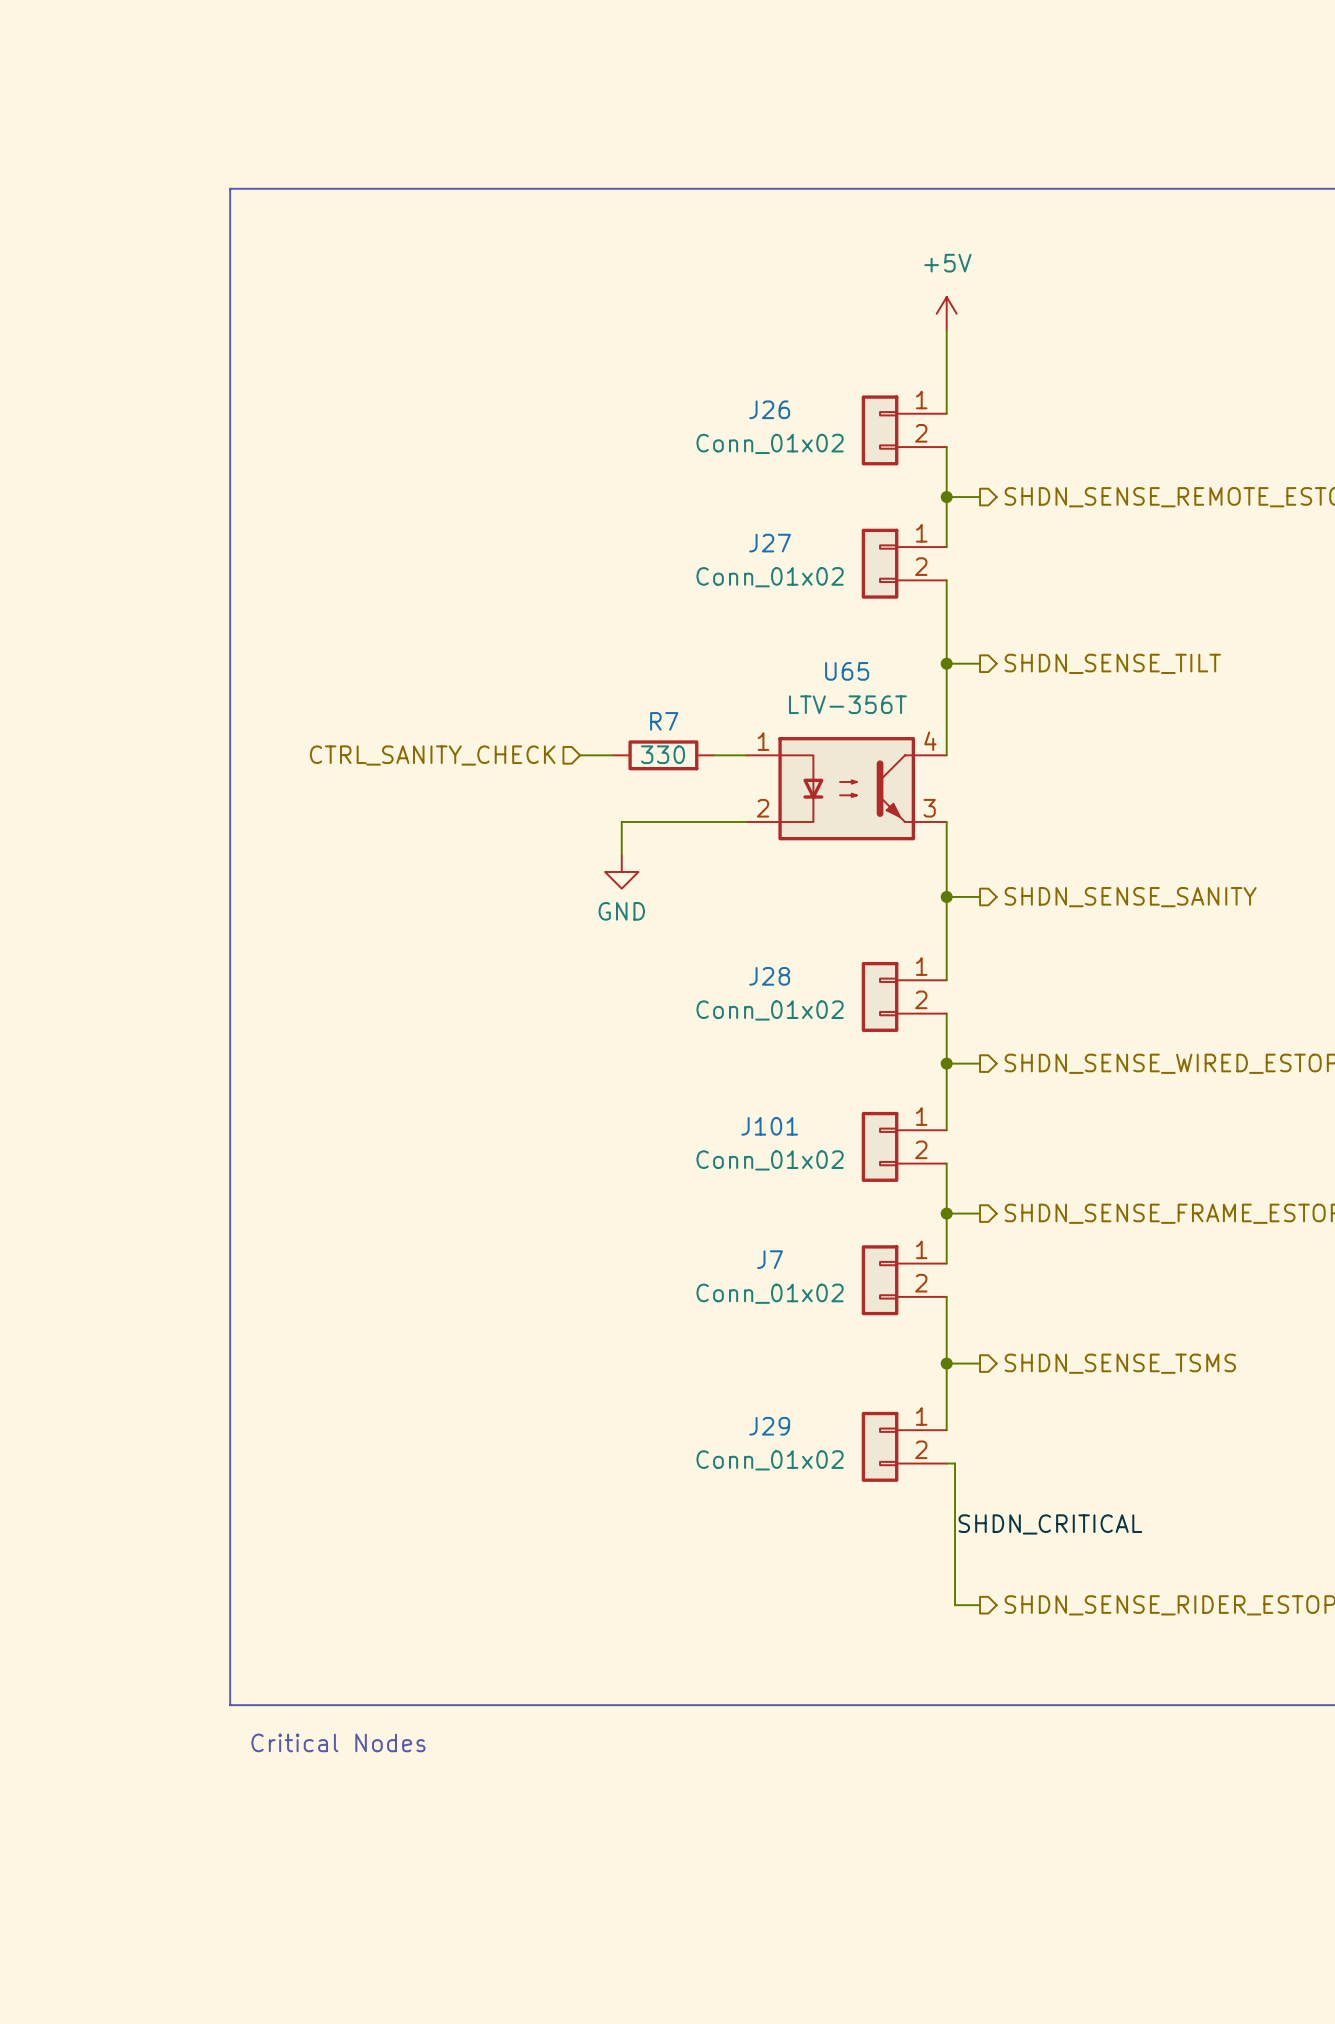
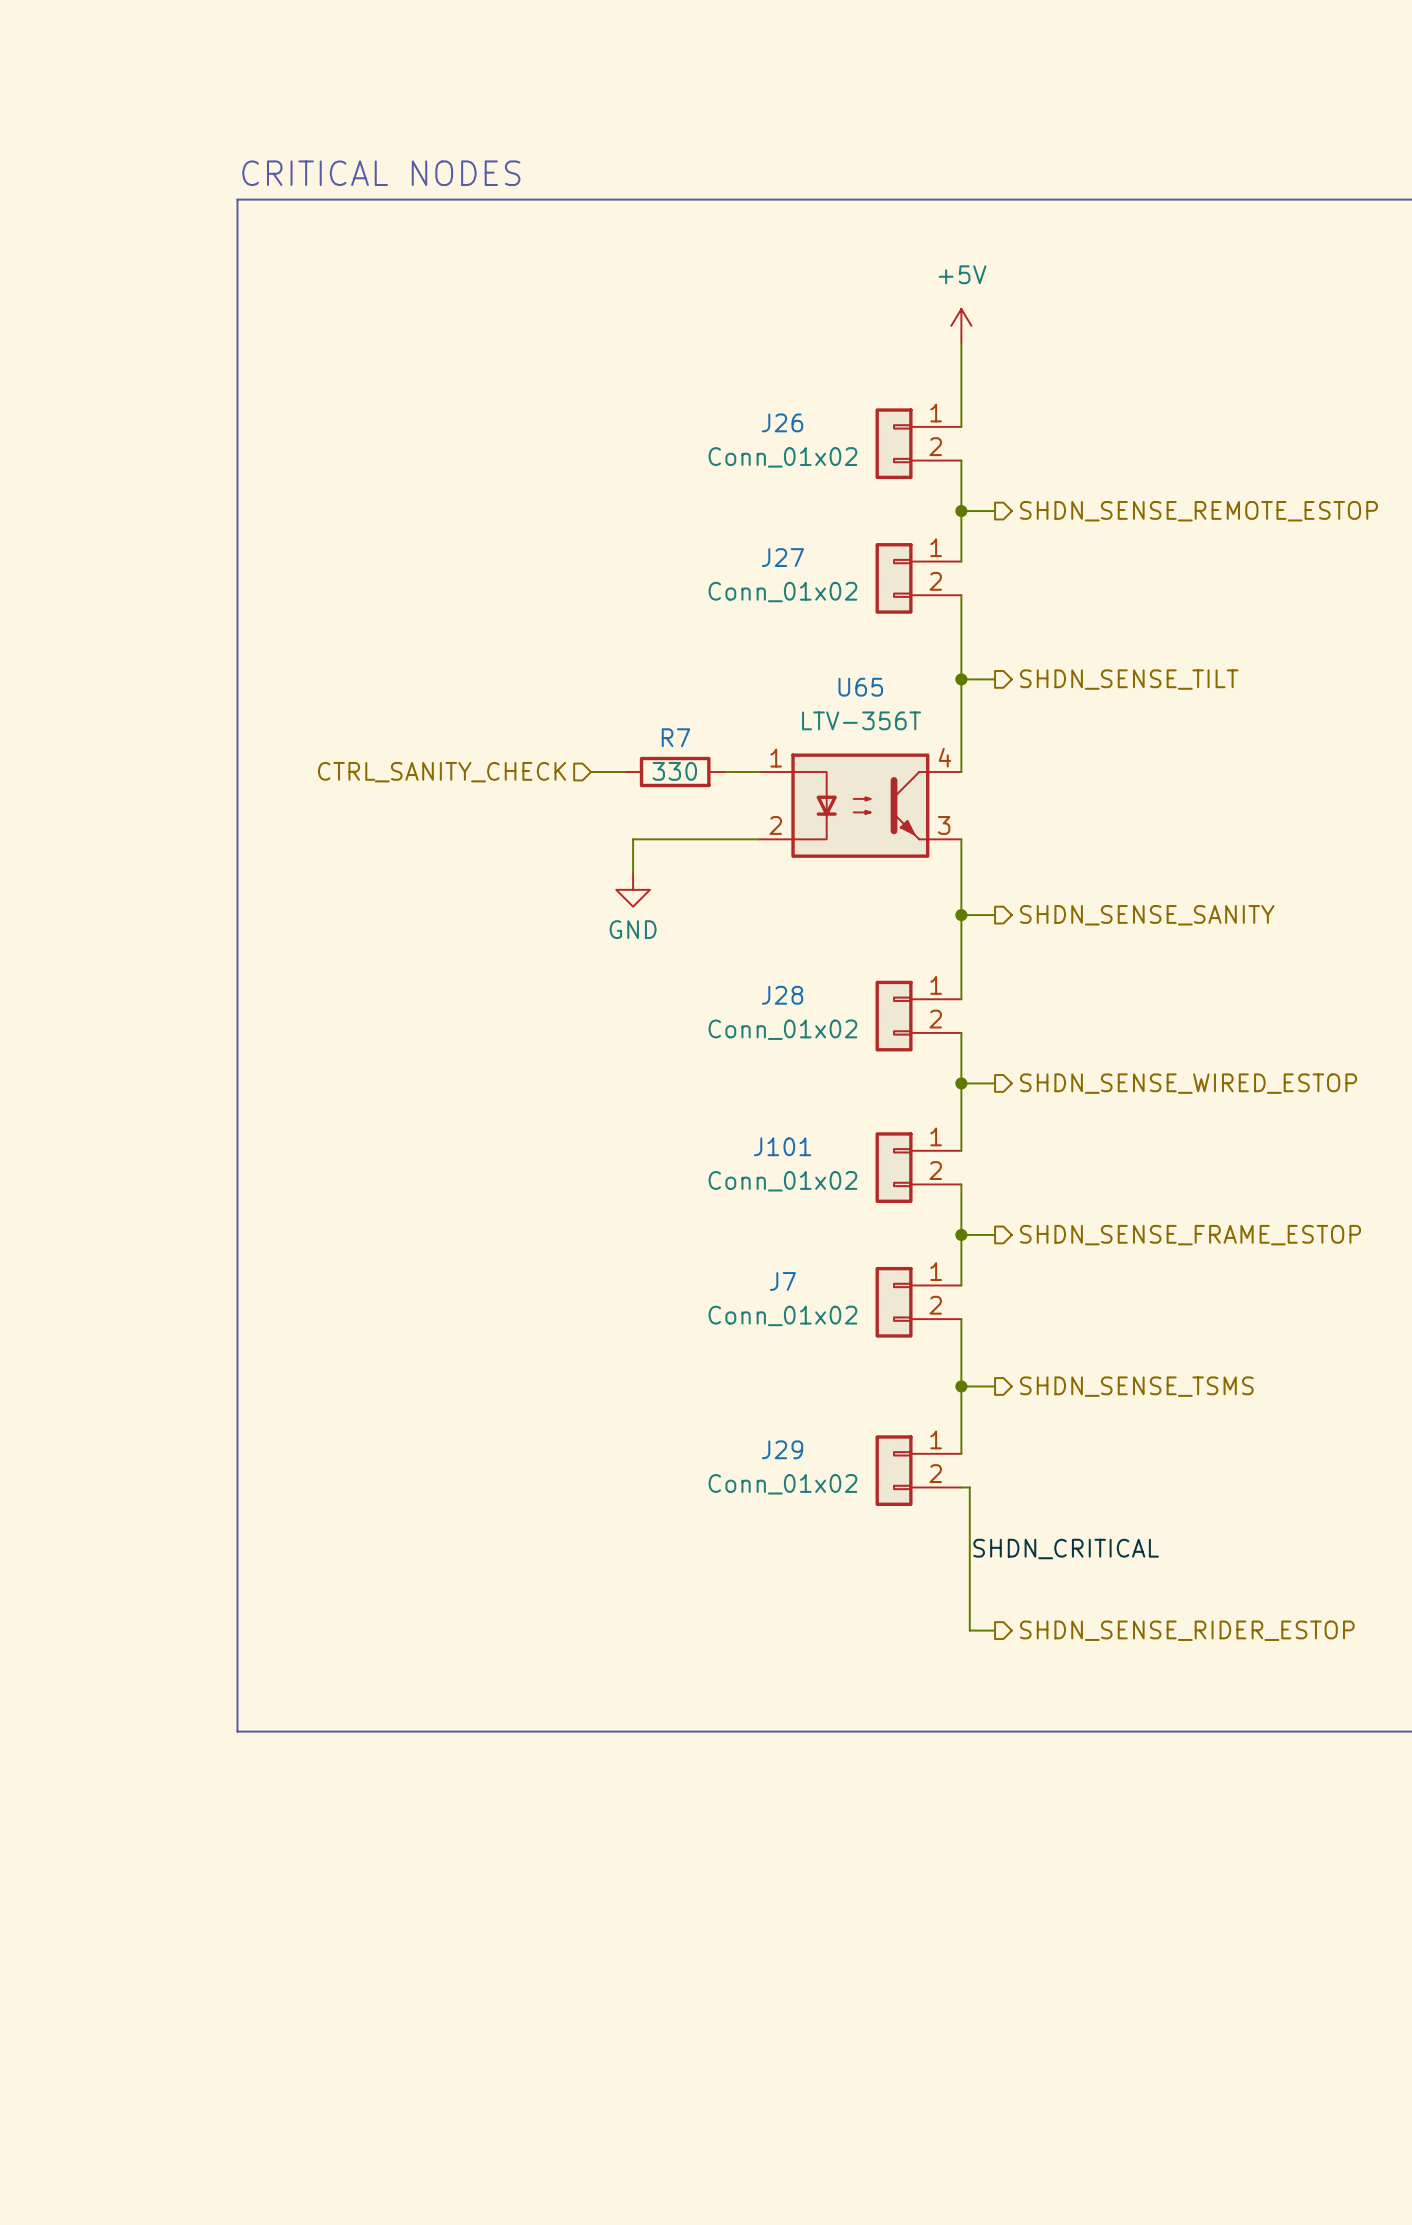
text: none -> CRITICAL NODES (381, 173)
text: Critical Nodes (338, 1742) -> none

